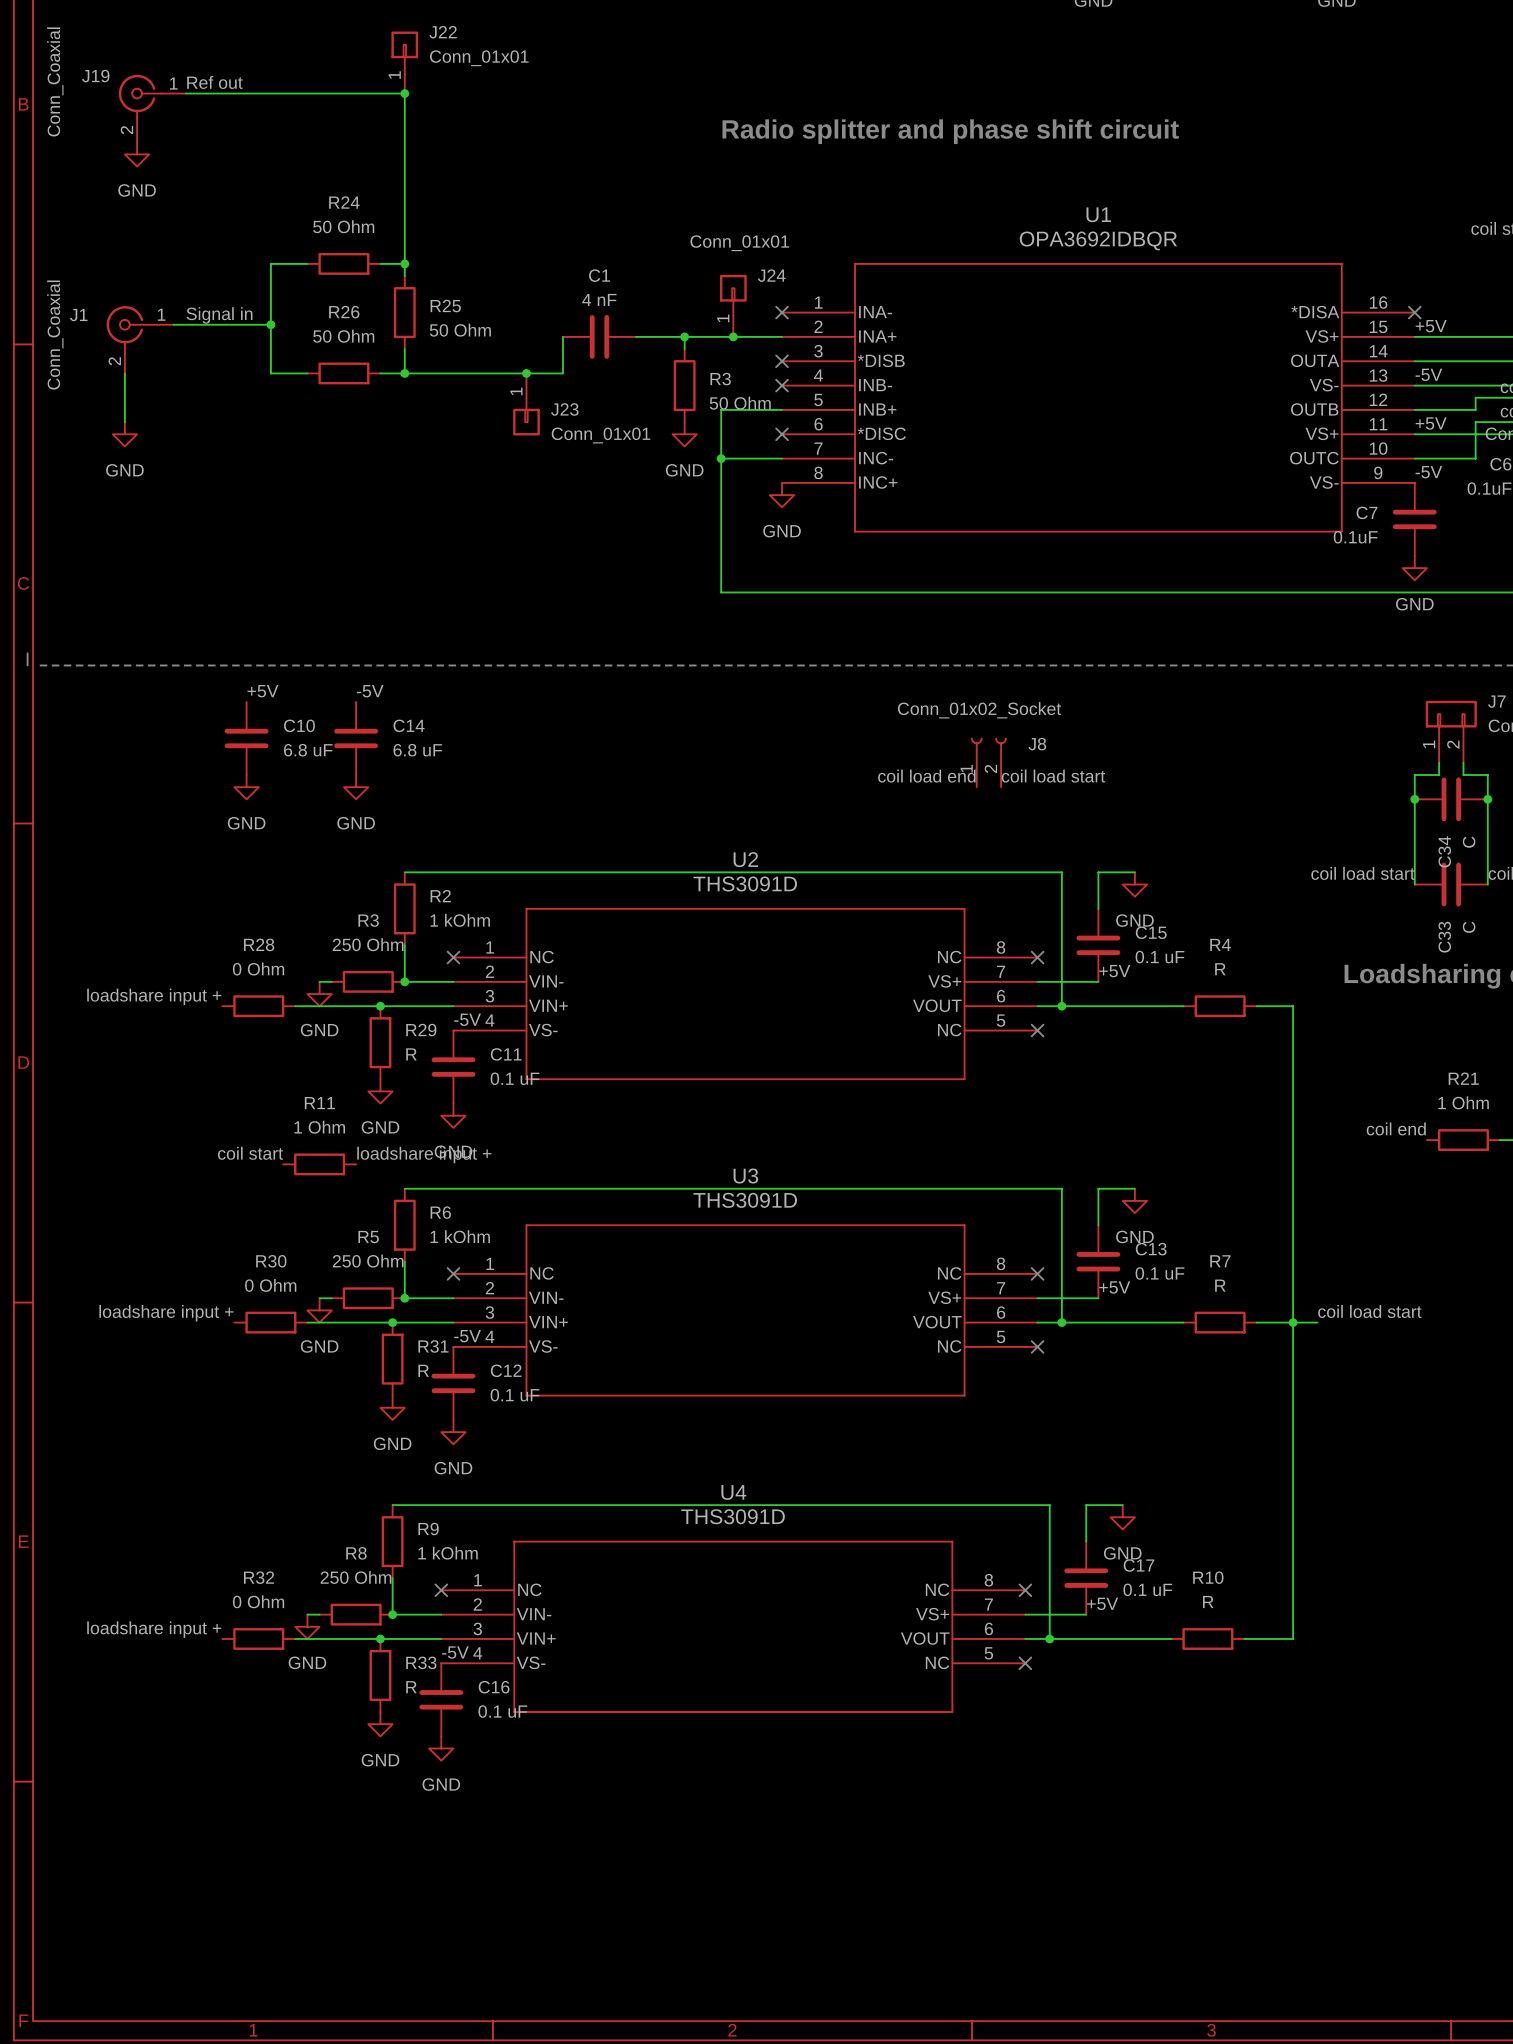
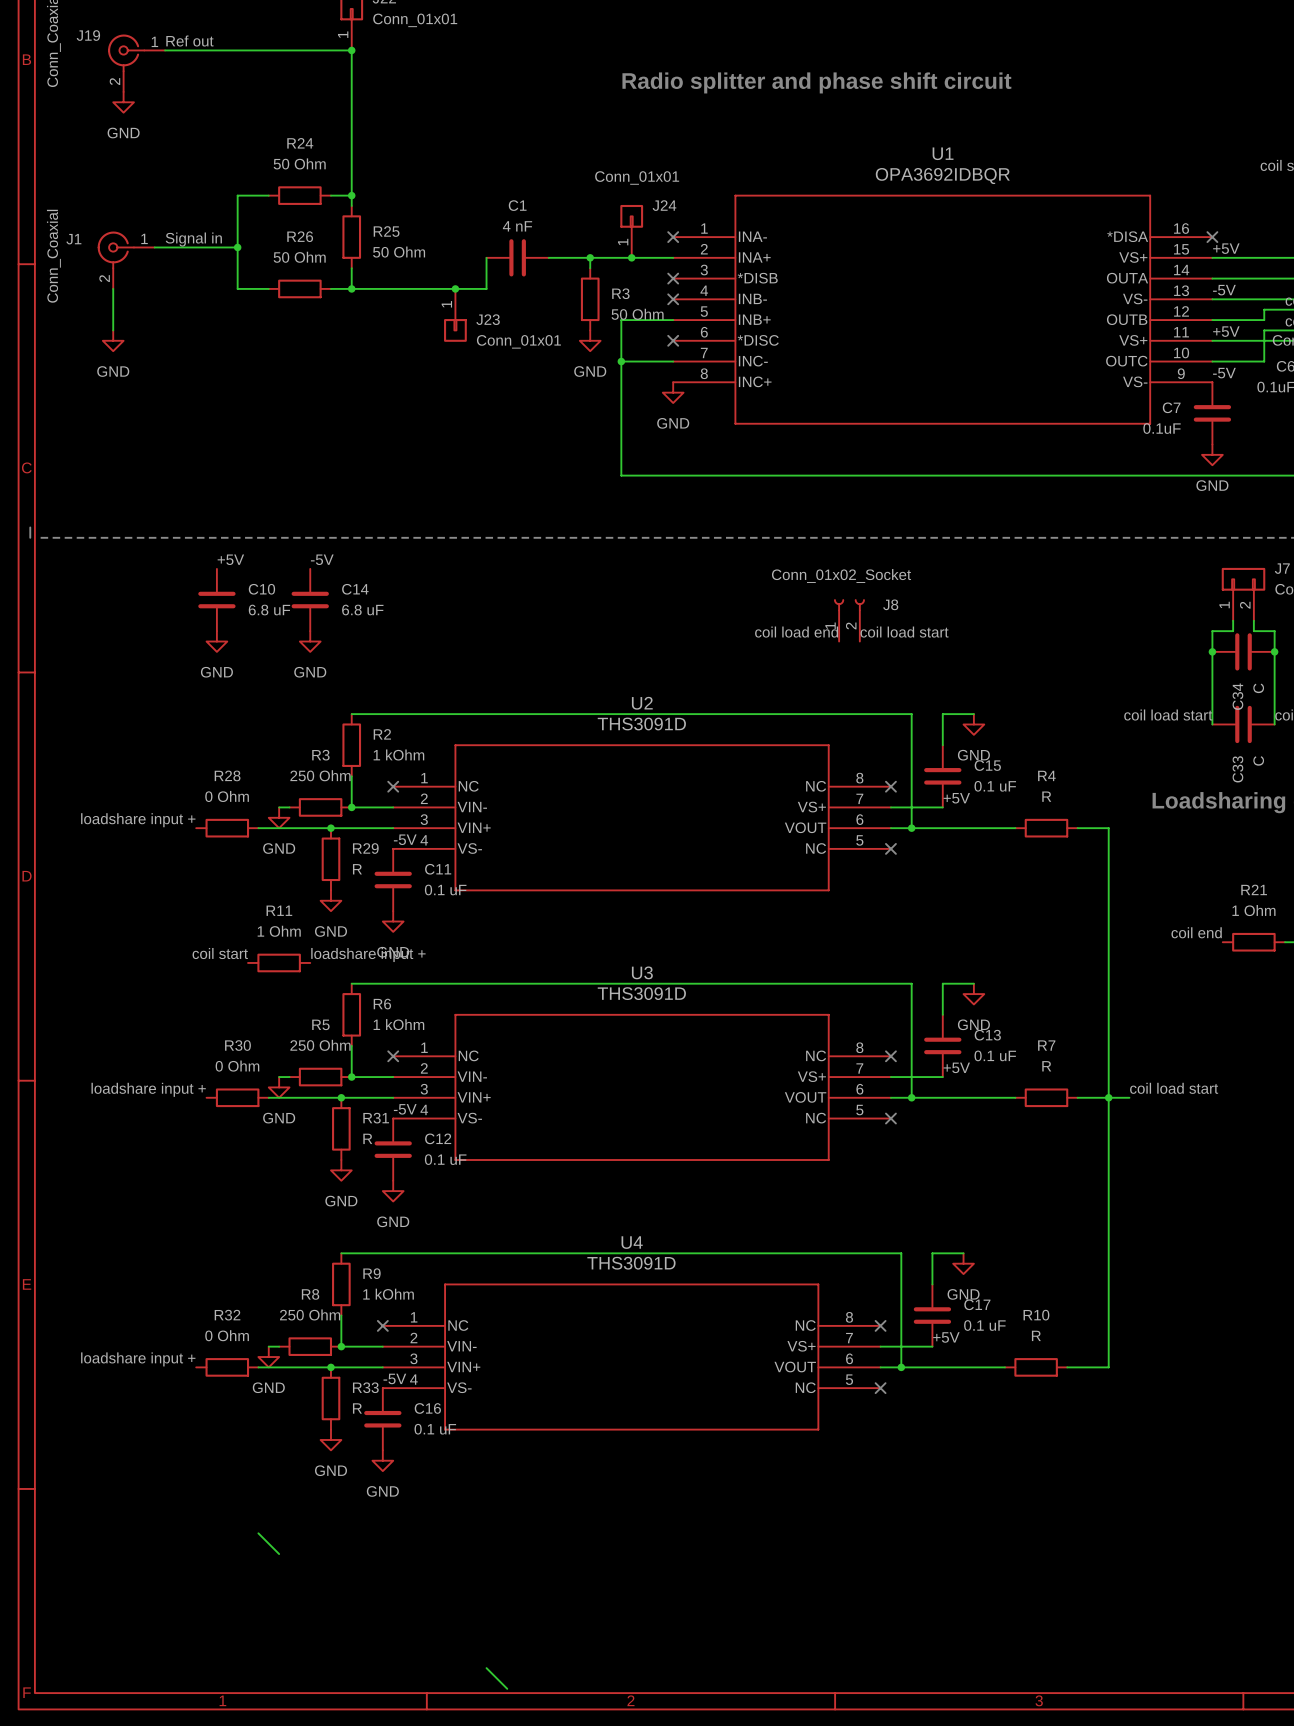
wire: none -> (258, 1533) (279, 1554)
wire: none -> (486, 1668) (507, 1688)

